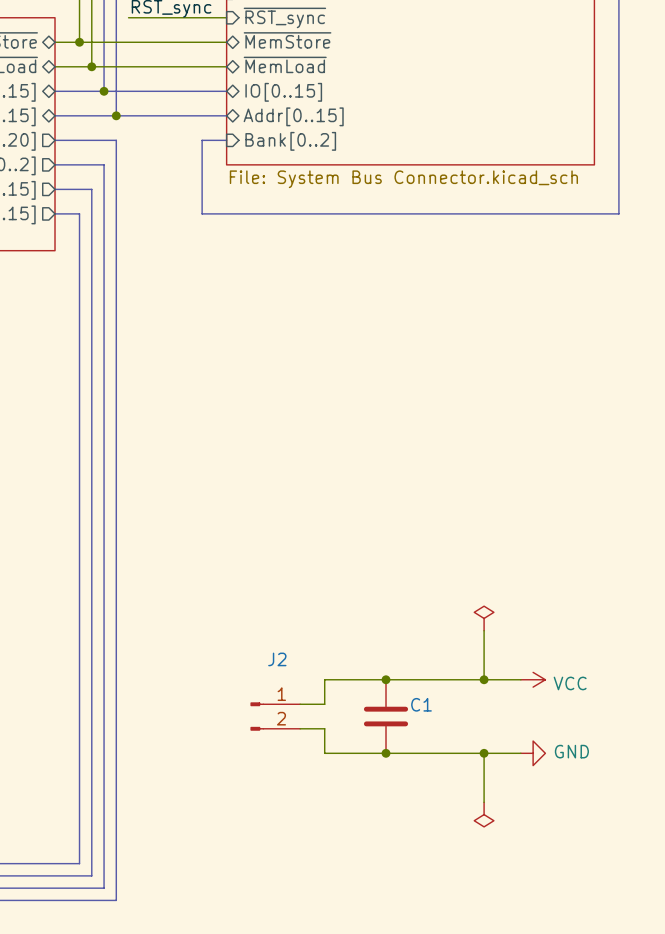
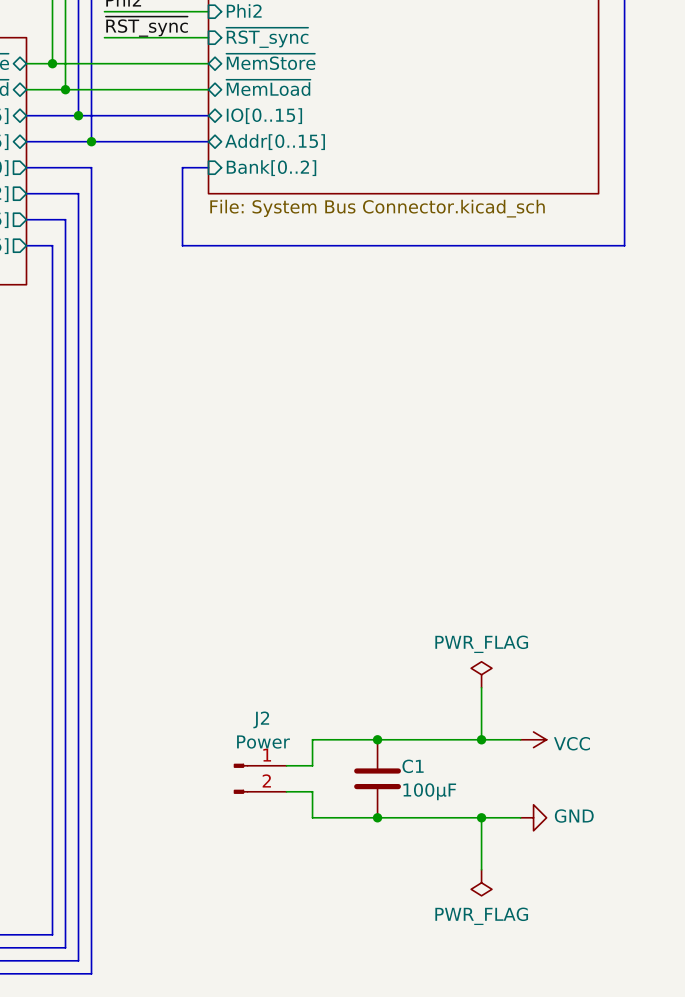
power symbol text: none -> PWR_FLAG (481, 644)
J2 value: none -> Power (263, 742)
C1 value: none -> 100µF (429, 791)
power symbol text: none -> PWR_FLAG (481, 916)

